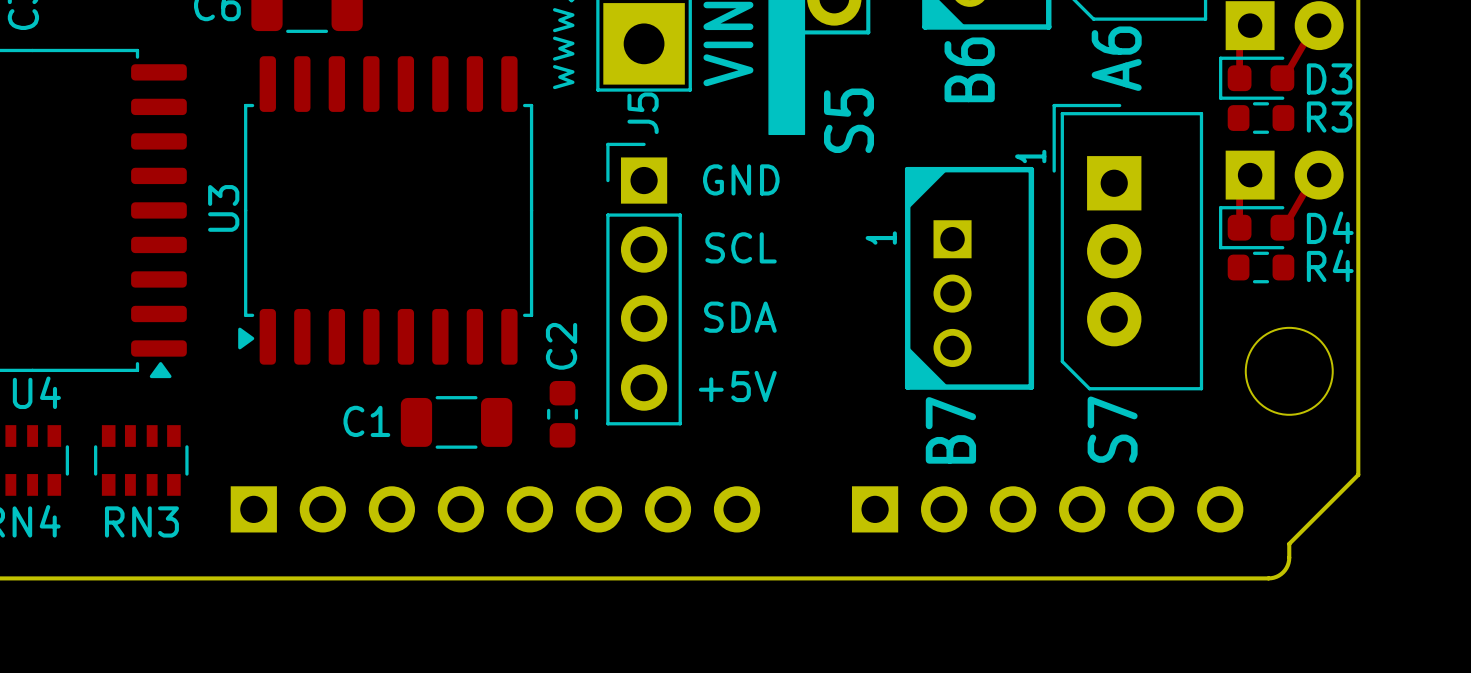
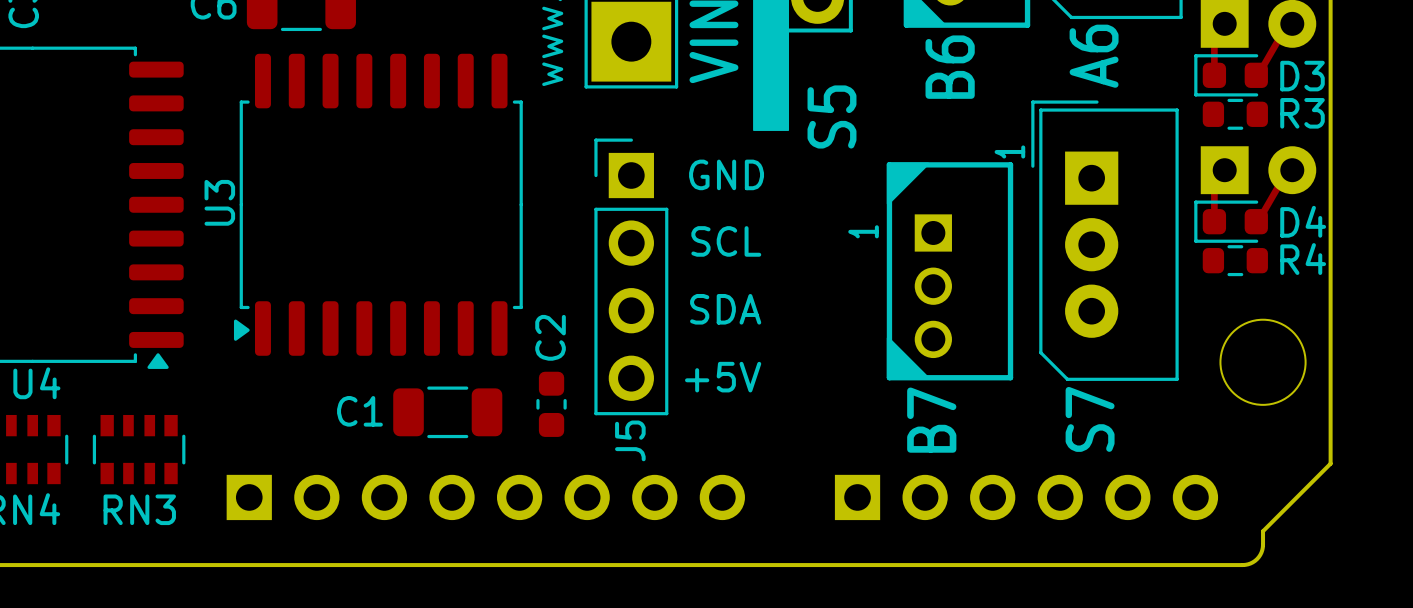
J5 name position: J5 (643, 113) -> J5 (630, 440)

